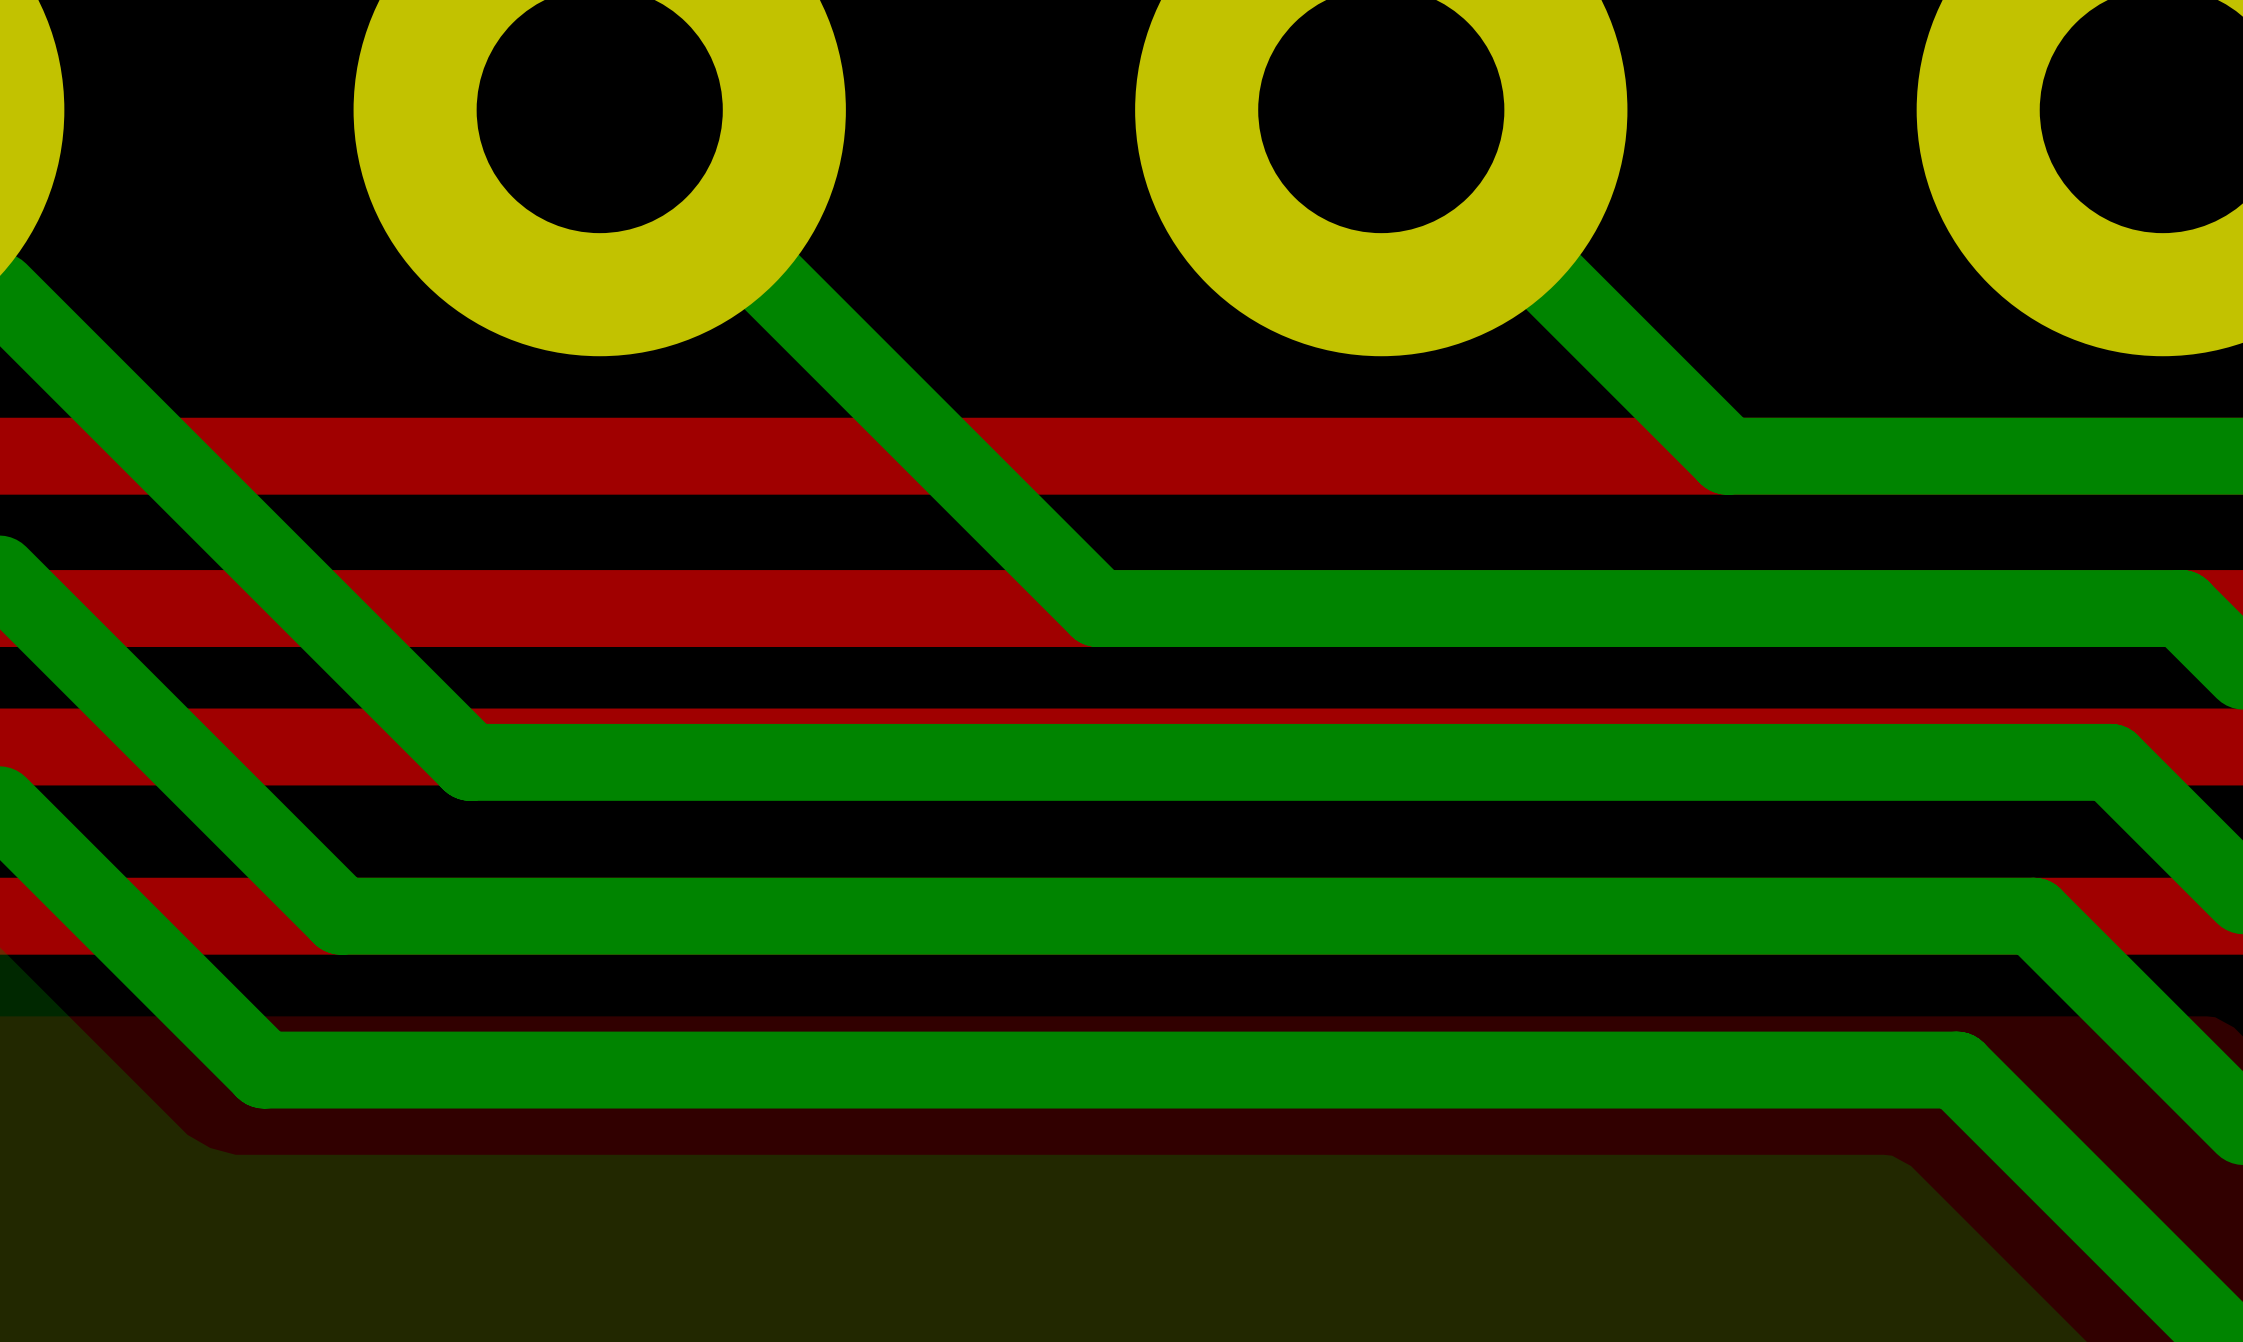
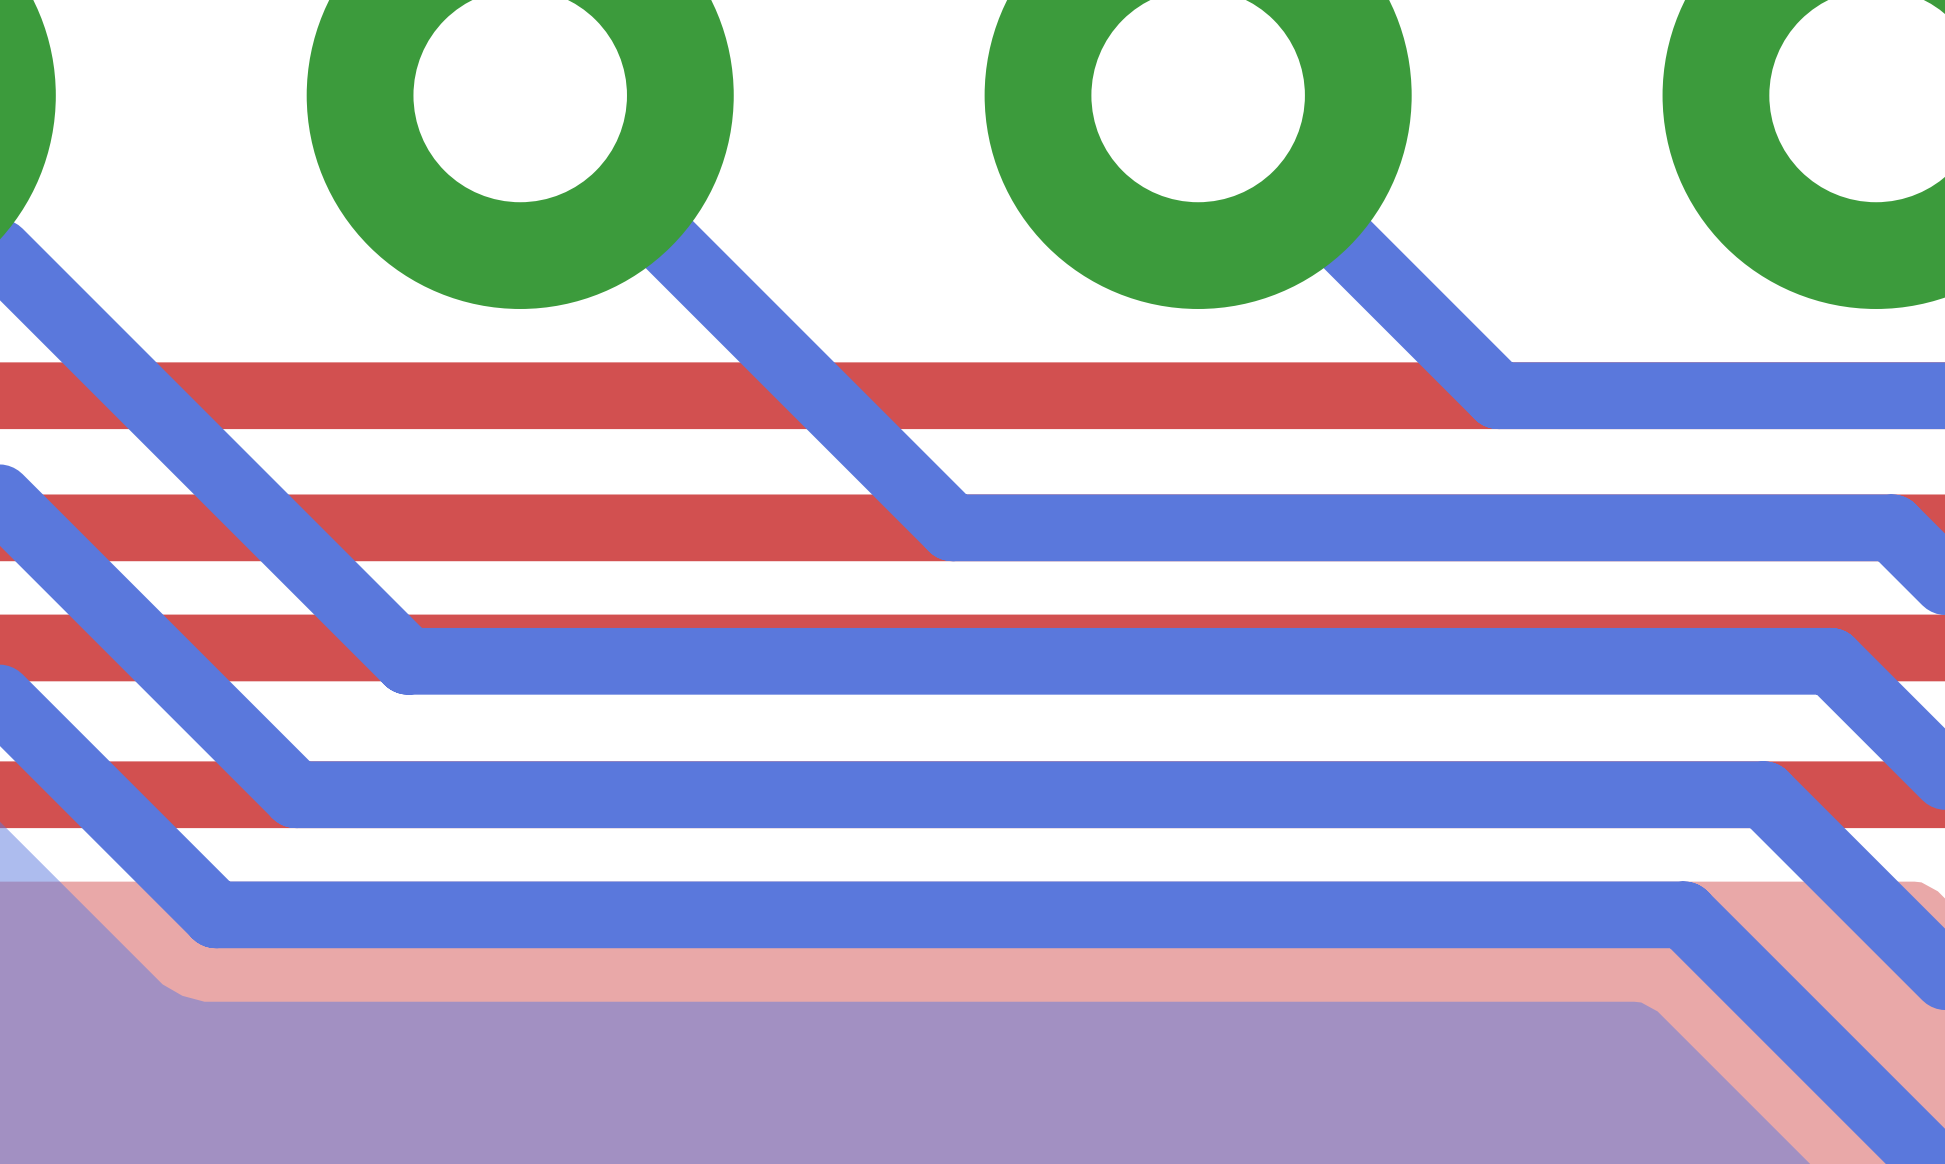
bottom track: (248, 1054) (264, 1070) (1956, 1070) -> (215, 914) (1683, 914) (1697, 928)

